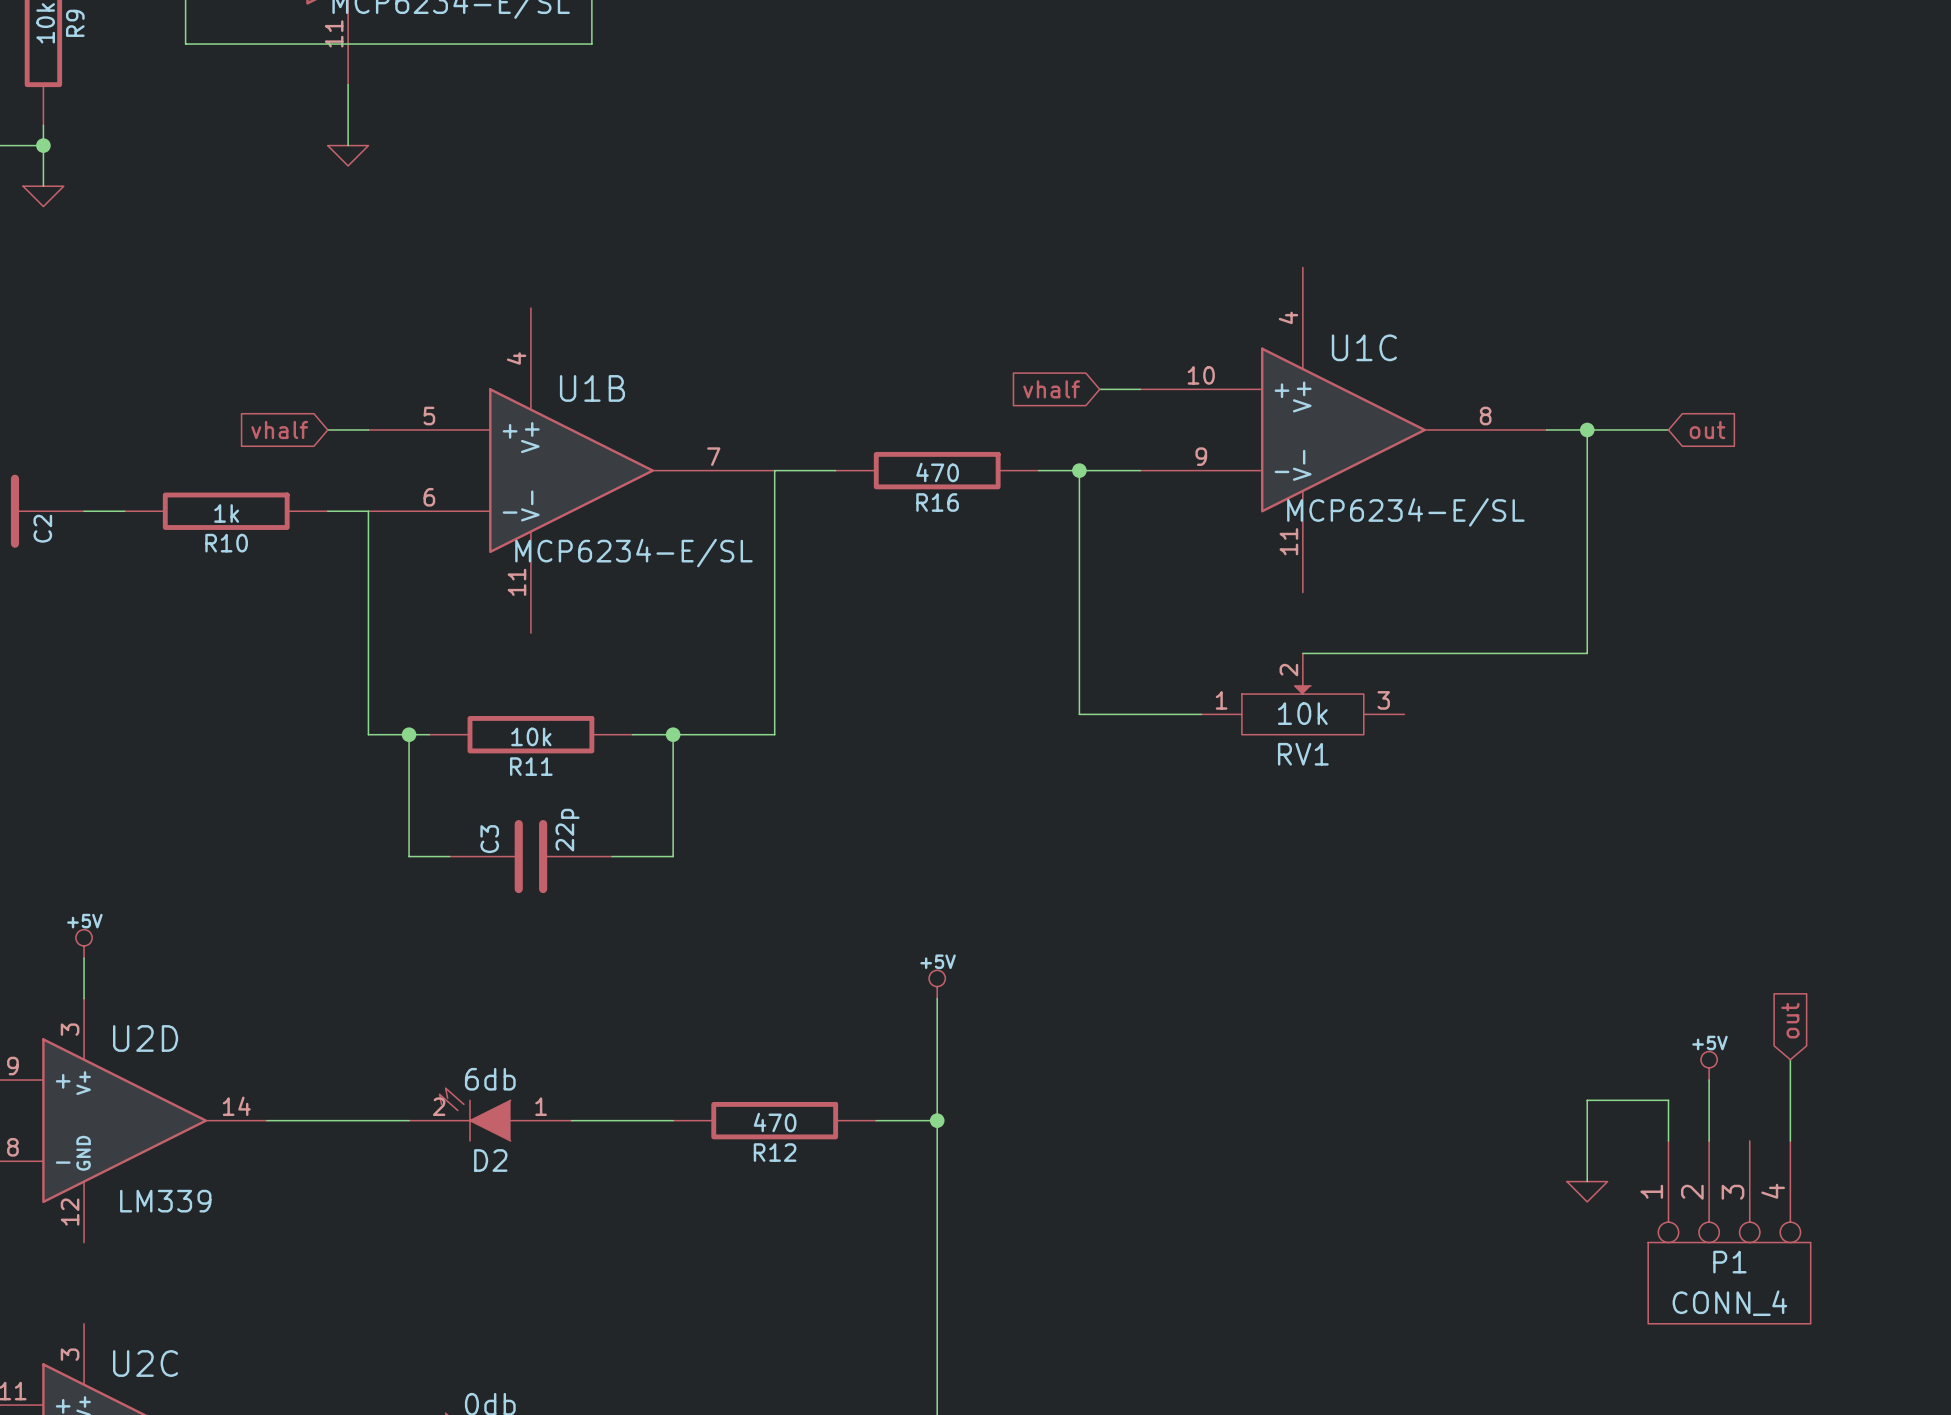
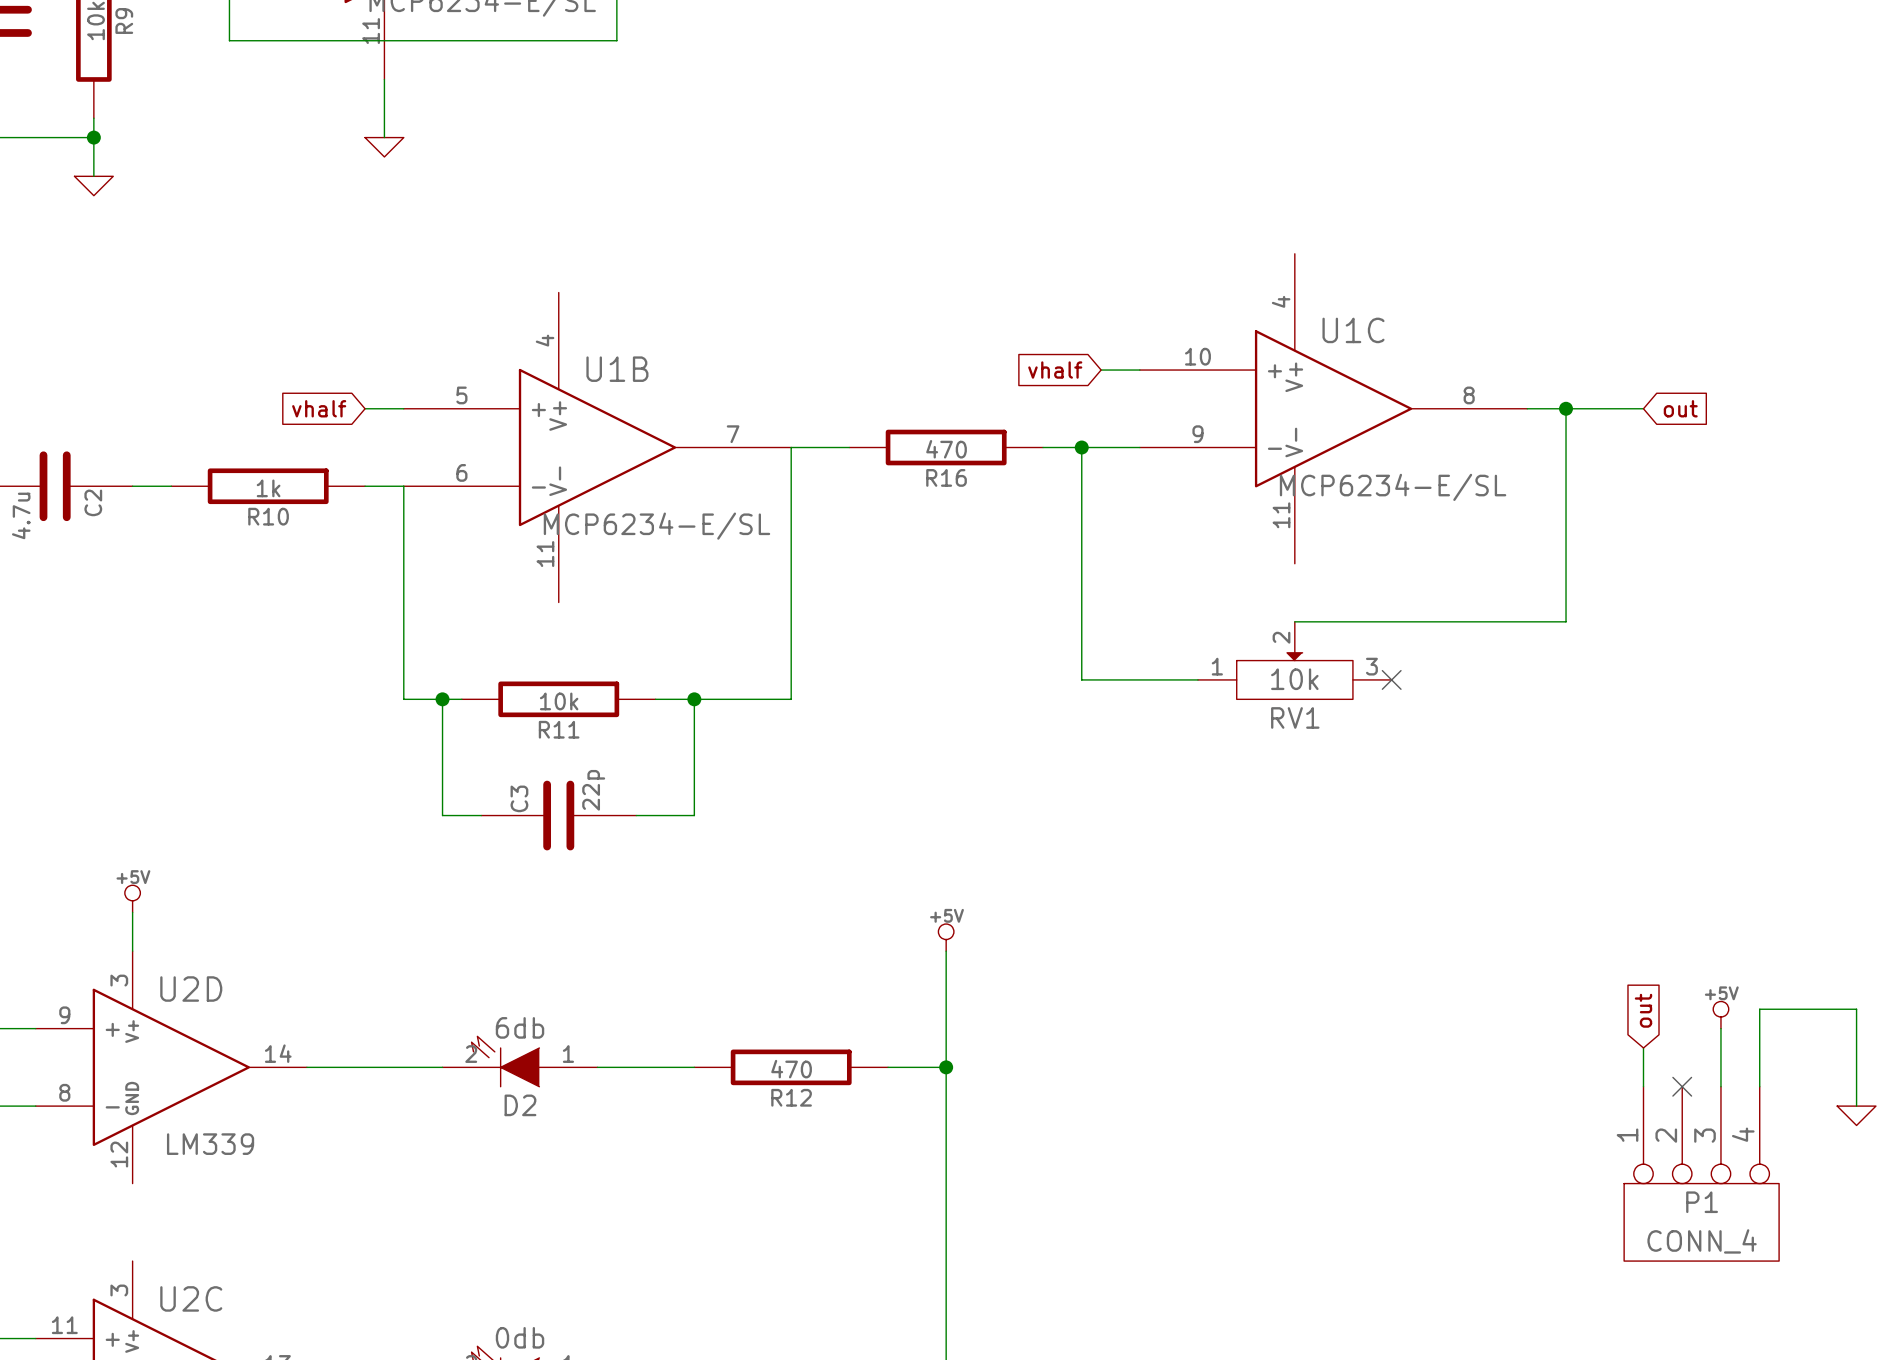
no-connect mark: none -> (1391, 679)
global label position: out (1790, 1020) -> out (1643, 1010)
wire: none -> (1759, 1009) (1856, 1009) (1856, 1106)
power symbol position: +5V (1709, 1065) -> +5V (1720, 1015)
wire: (1709, 1080) (1709, 1140) -> (1720, 1028) (1720, 1086)
wire: (1668, 1100) (1587, 1100) (1587, 1181) -> none
no-connect mark: none -> (1682, 1086)
power symbol position: (1587, 1191) -> (1856, 1115)

